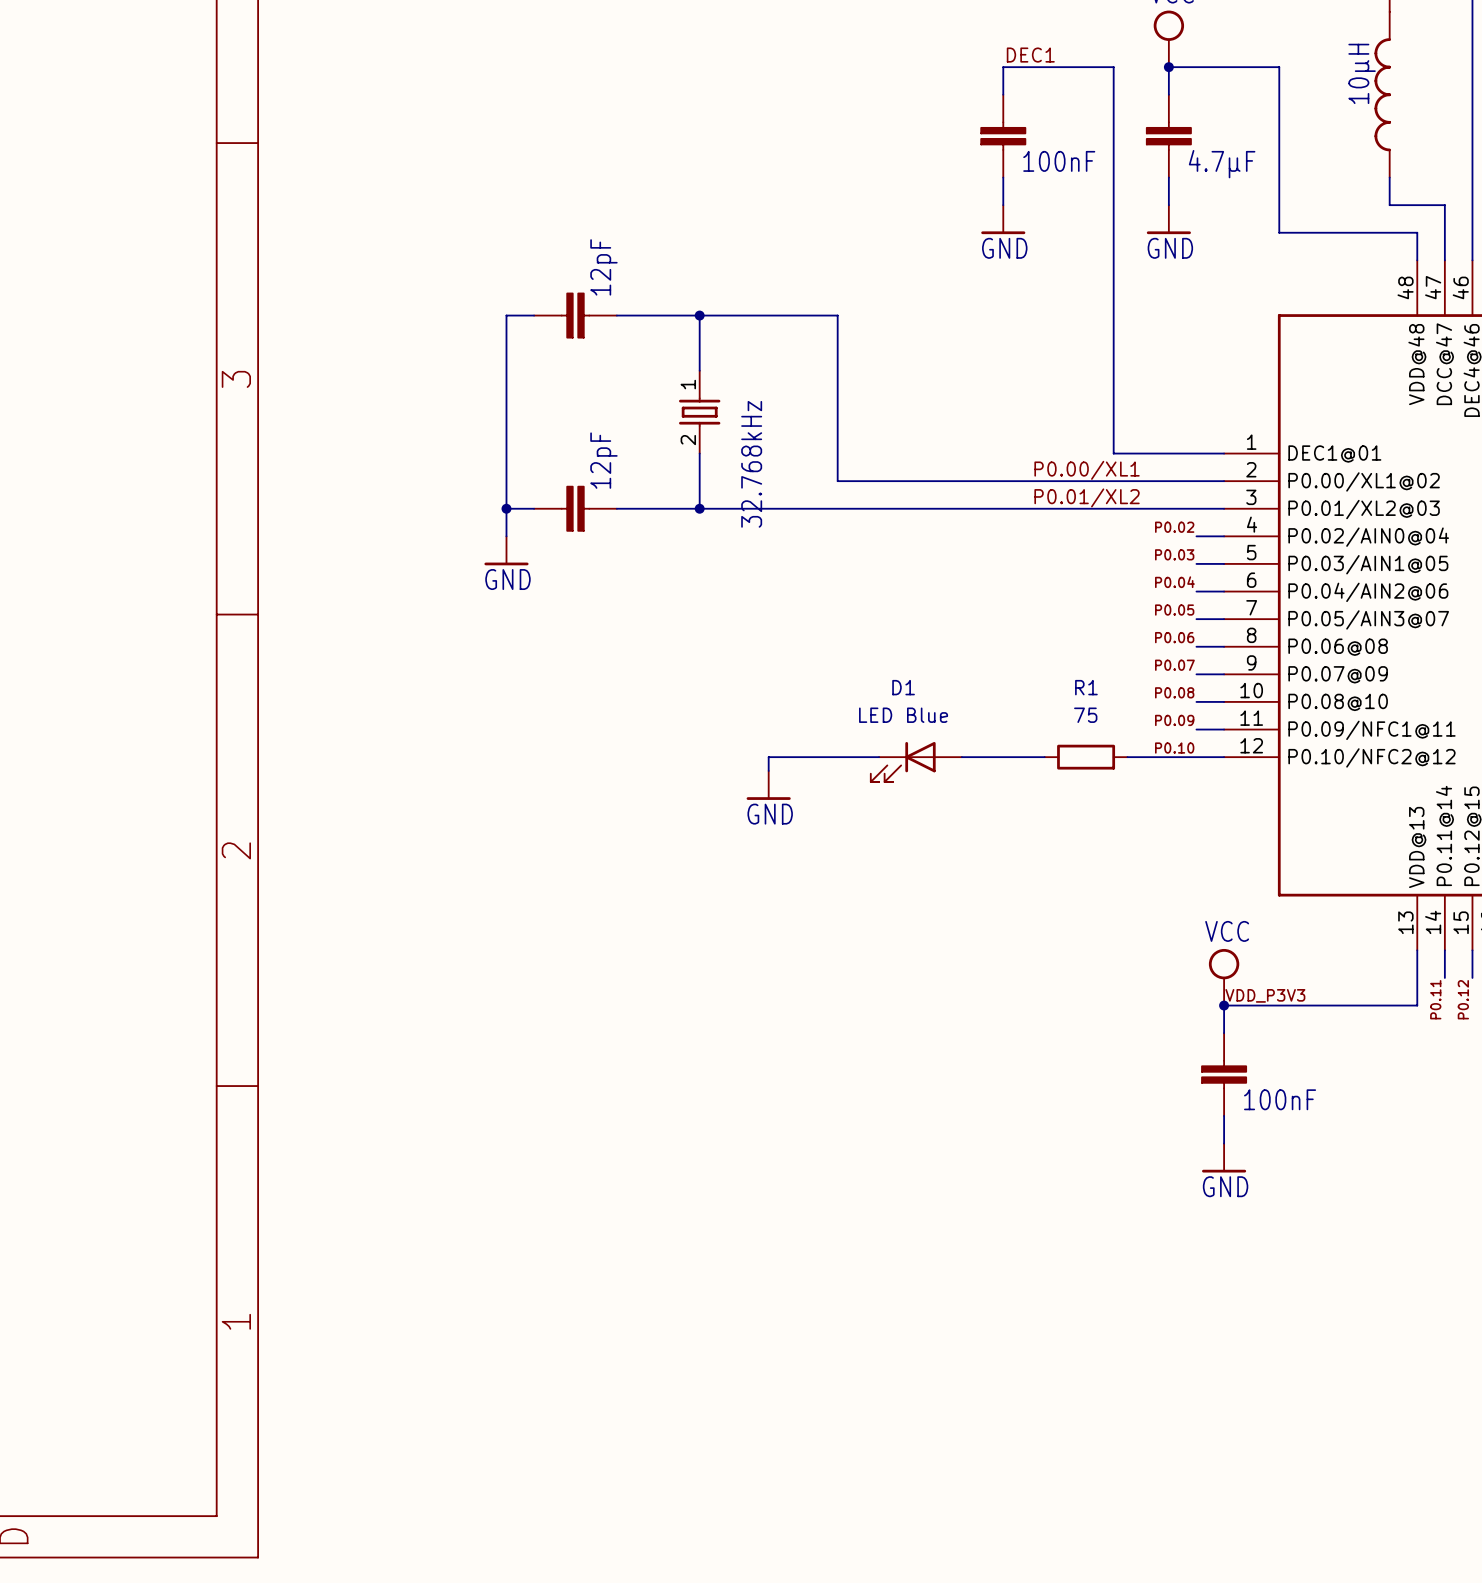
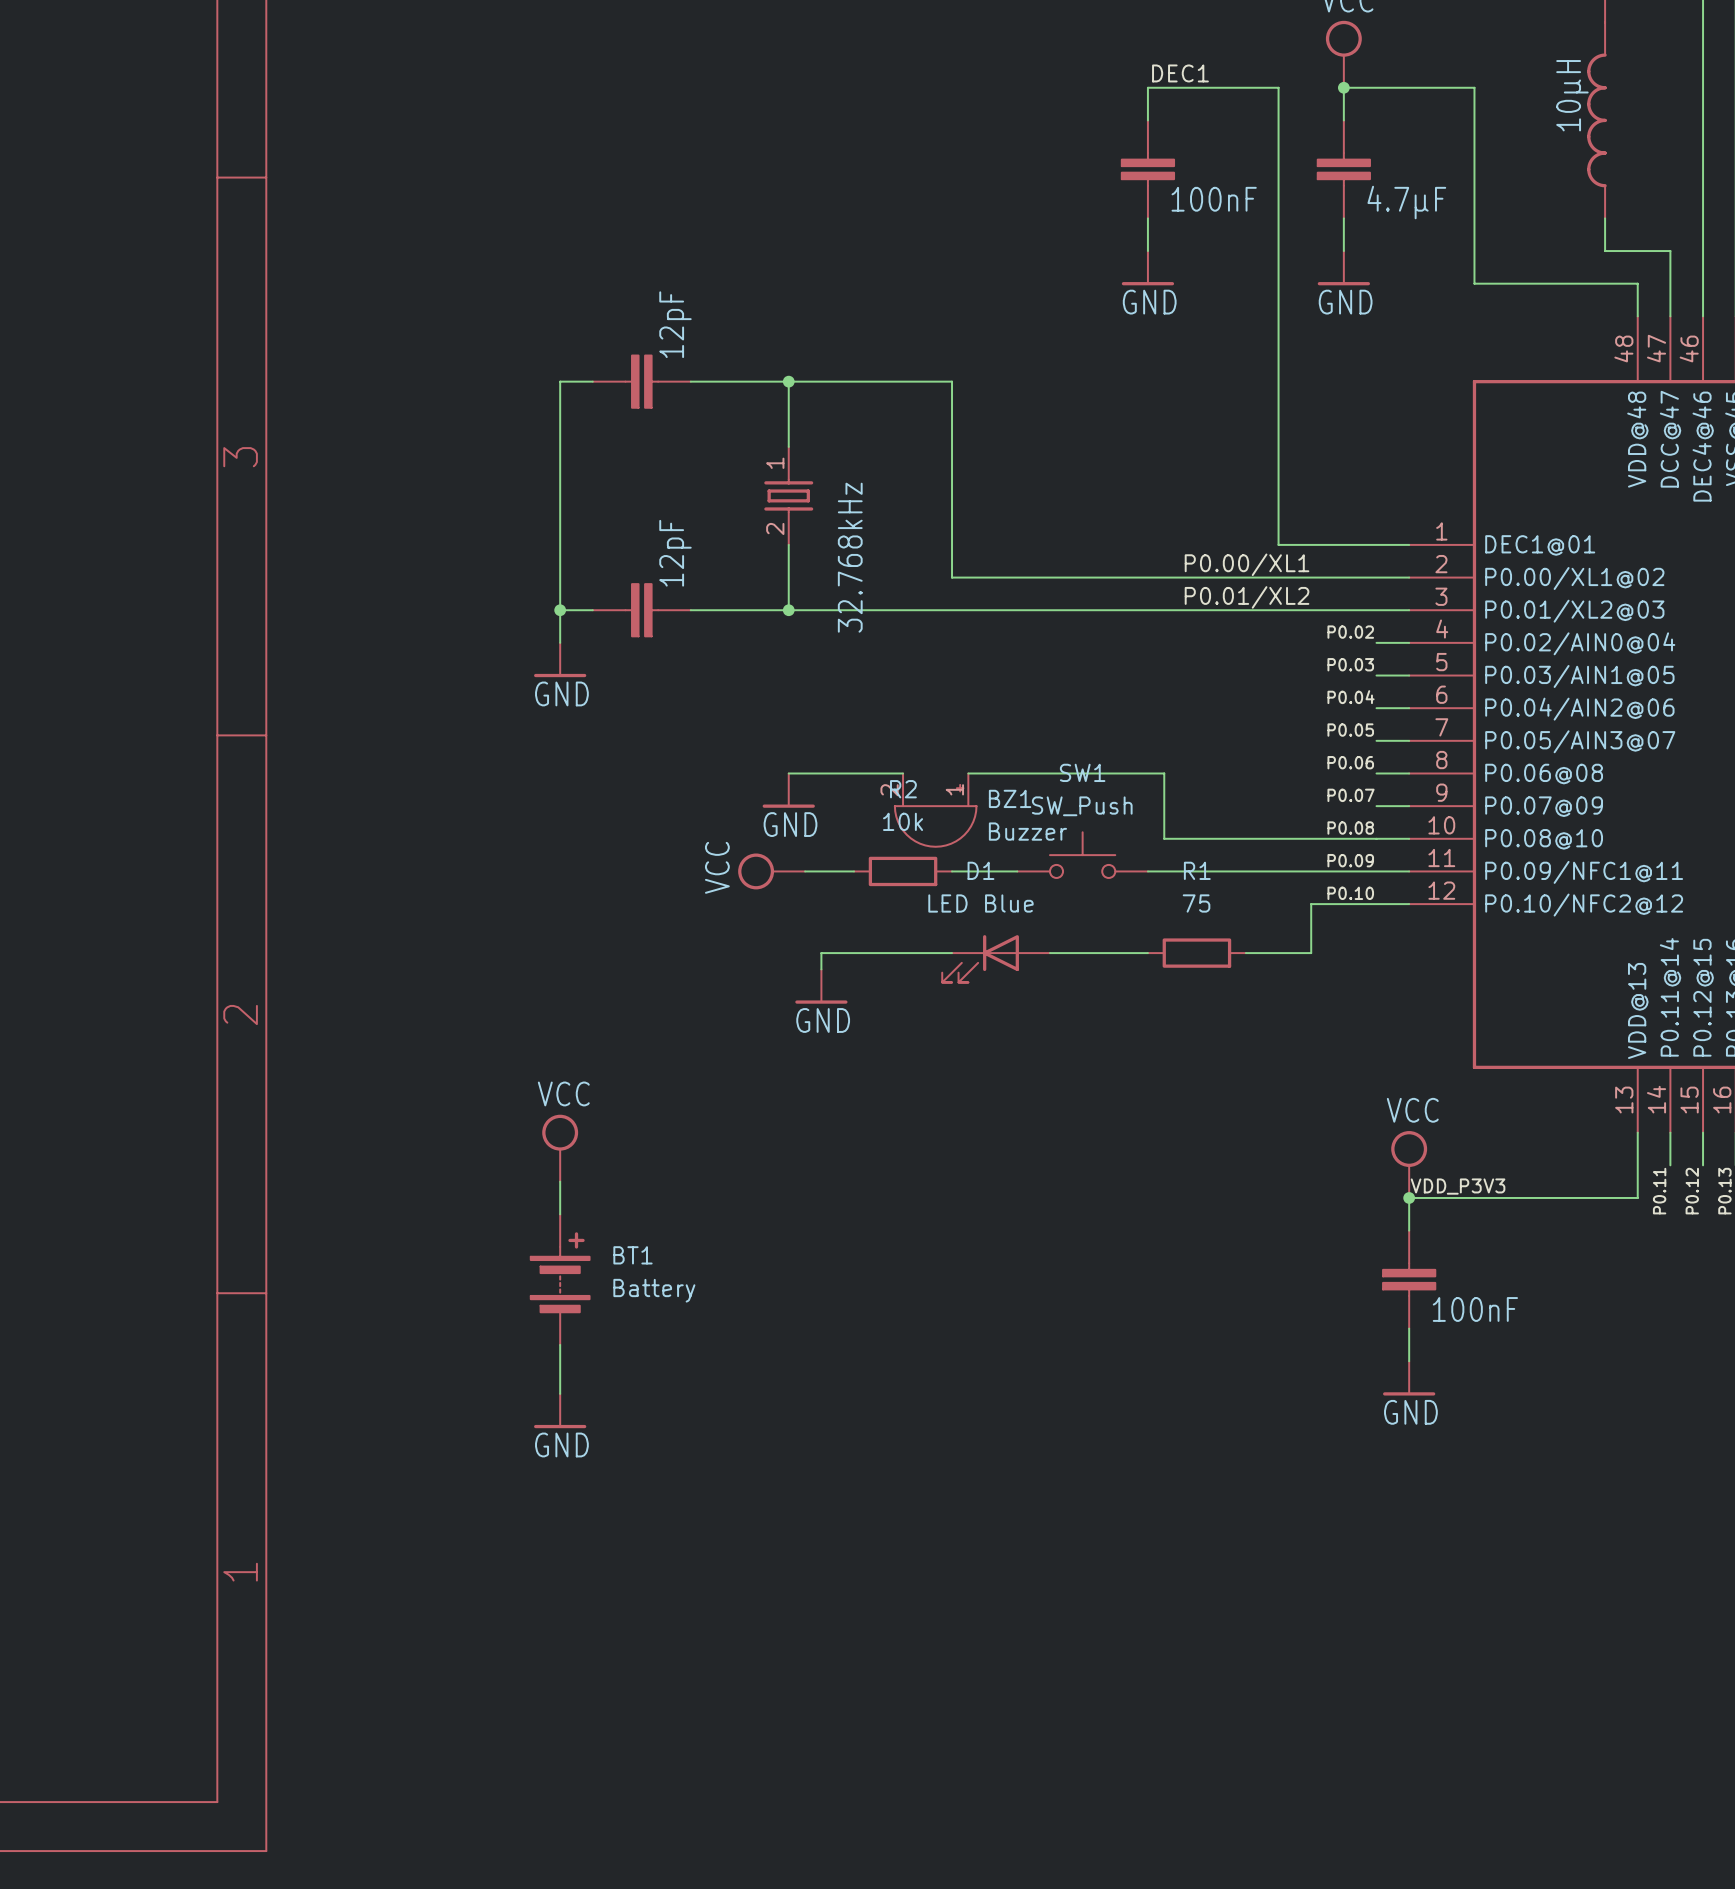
wire: none -> (788, 773) (903, 773)
wire: none -> (968, 773) (1164, 773) (1164, 838) (1376, 838)
power symbol: none -> GND (788, 790)
BZ1: none -> Buzzer (935, 810)
SW1: none -> SW_Push (1082, 855)
power symbol: none -> VCC (771, 871)
wire: none -> (805, 871) (854, 871)
R2: none -> 10k (903, 871)
wire: none -> (952, 871) (1017, 871)
wire: none -> (1147, 871) (1376, 871)
wire: (879, 757) (768, 757) (768, 770) -> (952, 953) (821, 953) (821, 969)
wire: (961, 757) (1044, 757) -> (1049, 953) (1147, 953)
R1 position: (1086, 757) -> (1196, 953)
wire: (1127, 757) (1141, 757) -> (1245, 953) (1311, 953) (1311, 904)
D1 position: (916, 761) -> (996, 958)
power symbol position: GND (768, 785) -> GND (821, 986)
power symbol: none -> VCC (560, 1148)
wire: none -> (560, 1181) (560, 1214)
BT1: none -> Battery (560, 1279)
wire: none -> (560, 1344) (560, 1393)
power symbol: none -> GND (560, 1411)

